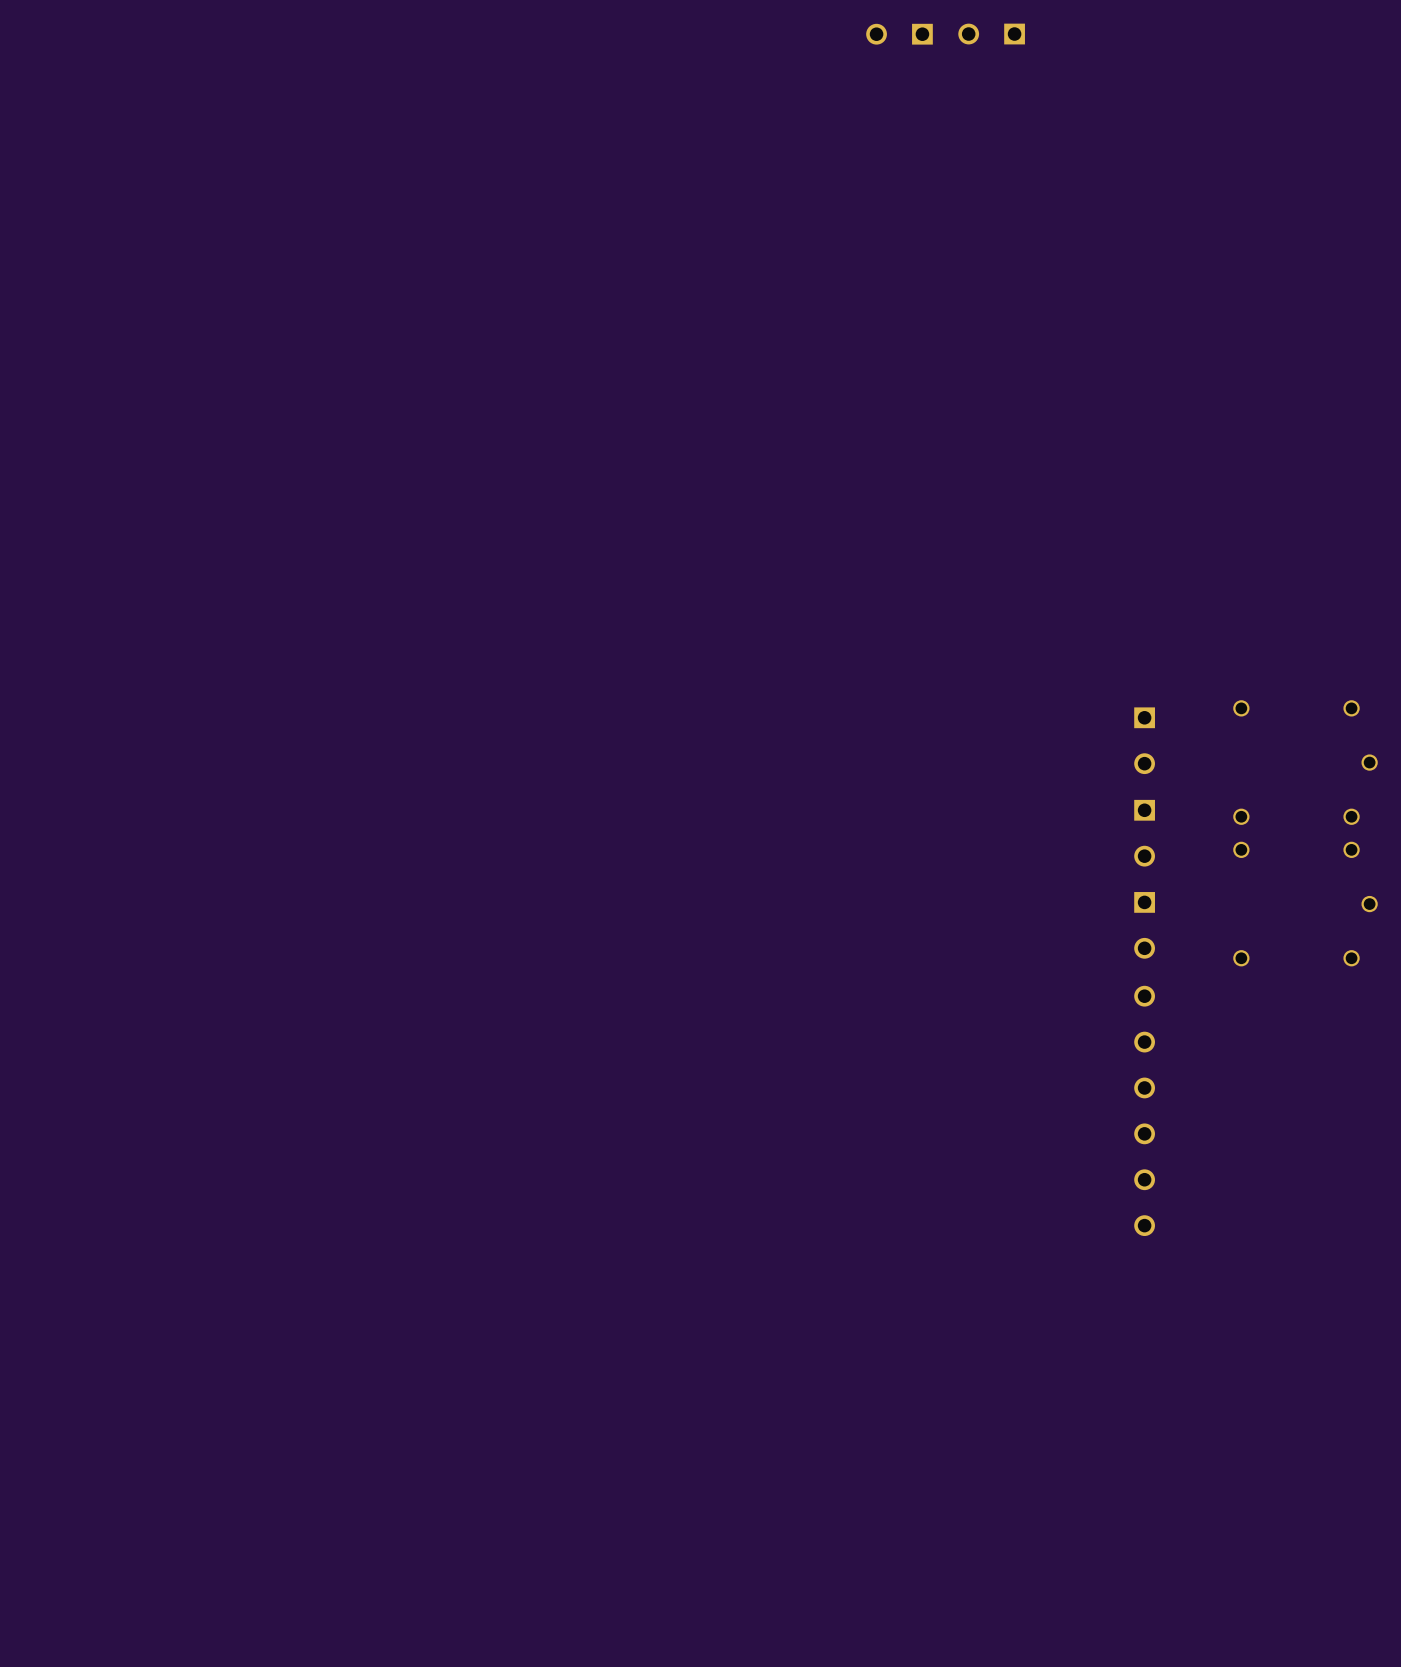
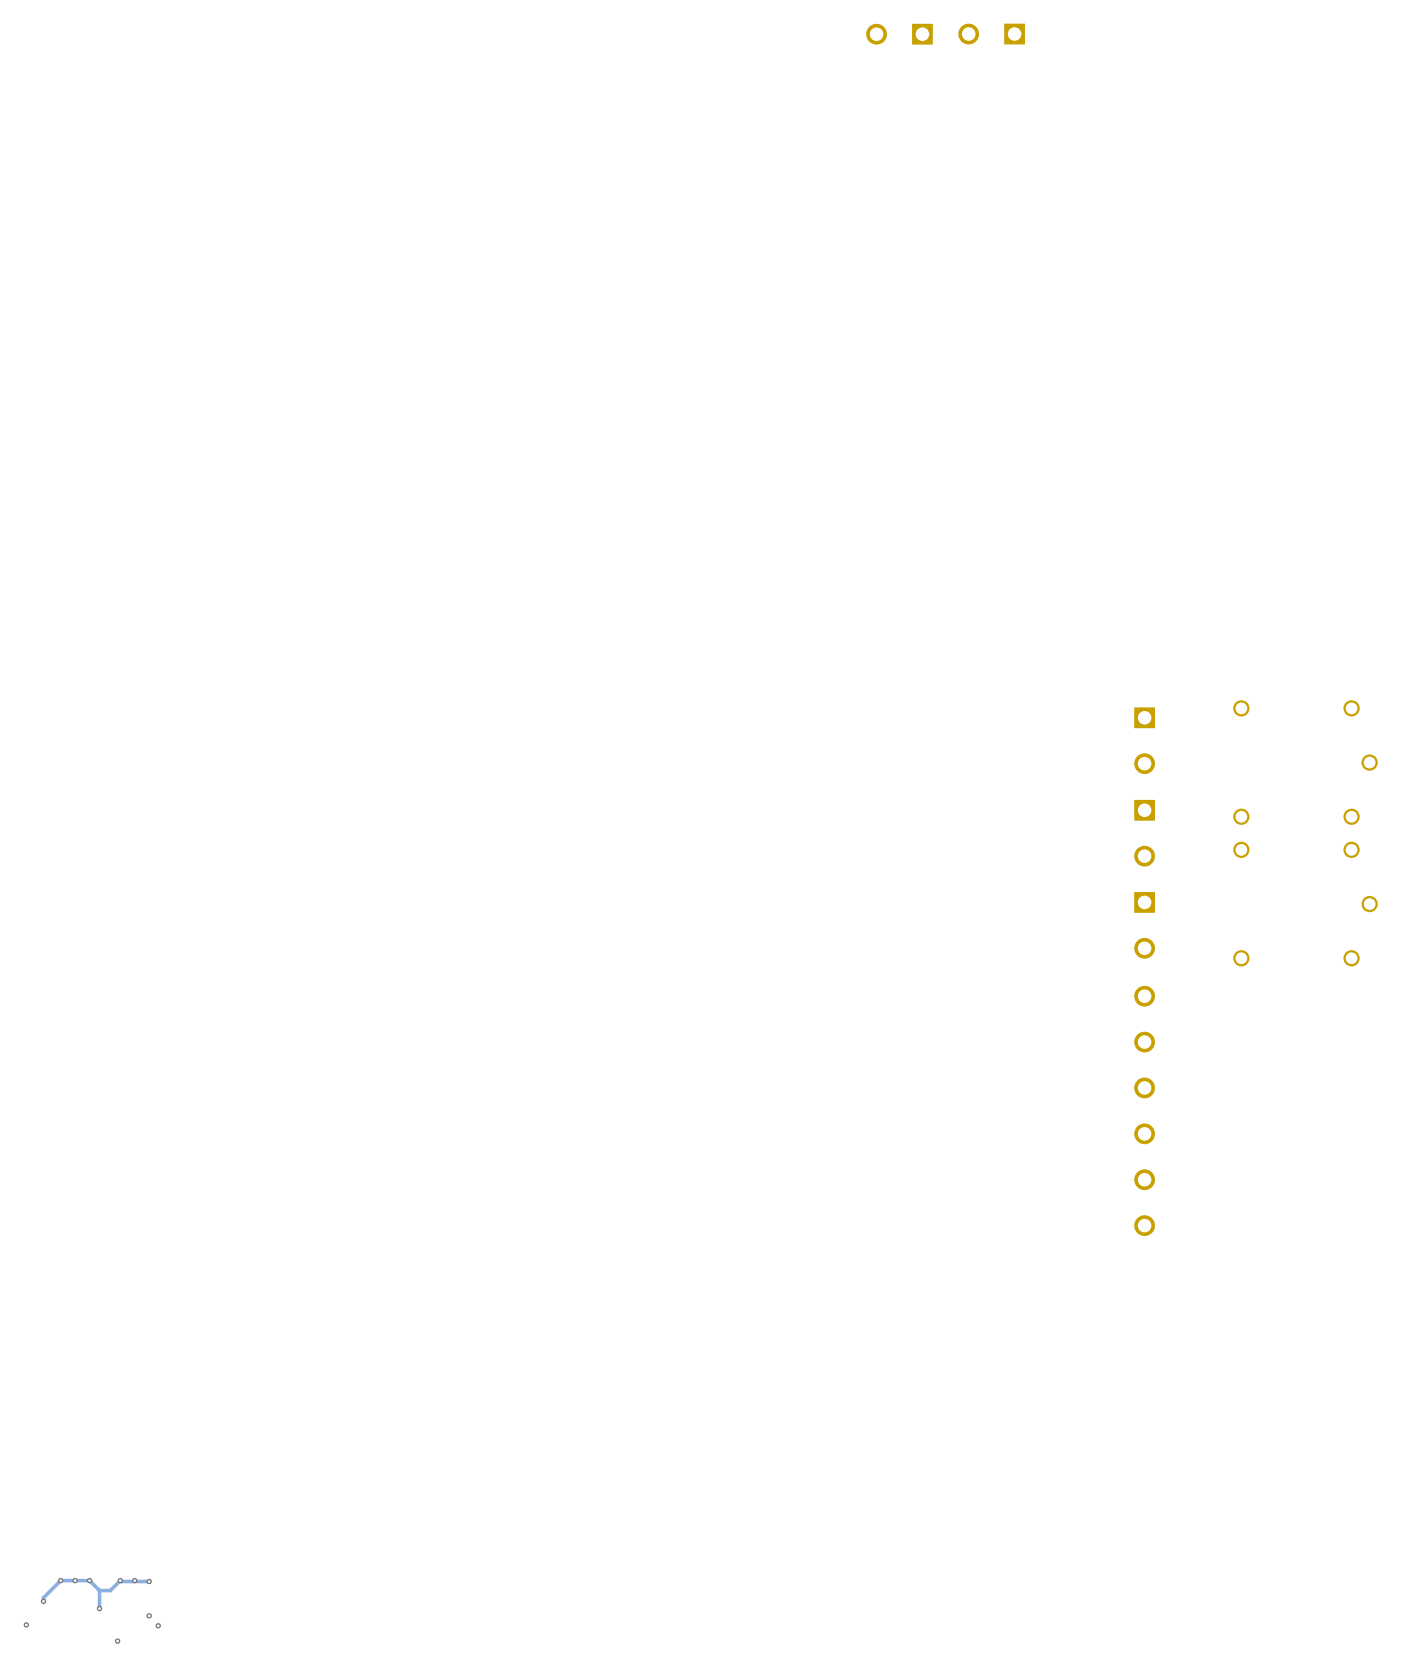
via: none -> (60, 1580)
via: none -> (75, 1580)
via: none -> (89, 1580)
via: none -> (120, 1580)
via: none -> (134, 1580)
track: none -> (149, 1581) (120, 1580) (110, 1590) (99, 1590)
via: none -> (149, 1581)
track: none -> (99, 1590) (89, 1580) (60, 1580) (43, 1597) (43, 1601)
track: none -> (99, 1590) (99, 1608)
via: none -> (43, 1601)
via: none -> (99, 1608)
via: none -> (149, 1615)
via: none -> (26, 1624)
via: none -> (158, 1625)
via: none -> (117, 1641)

